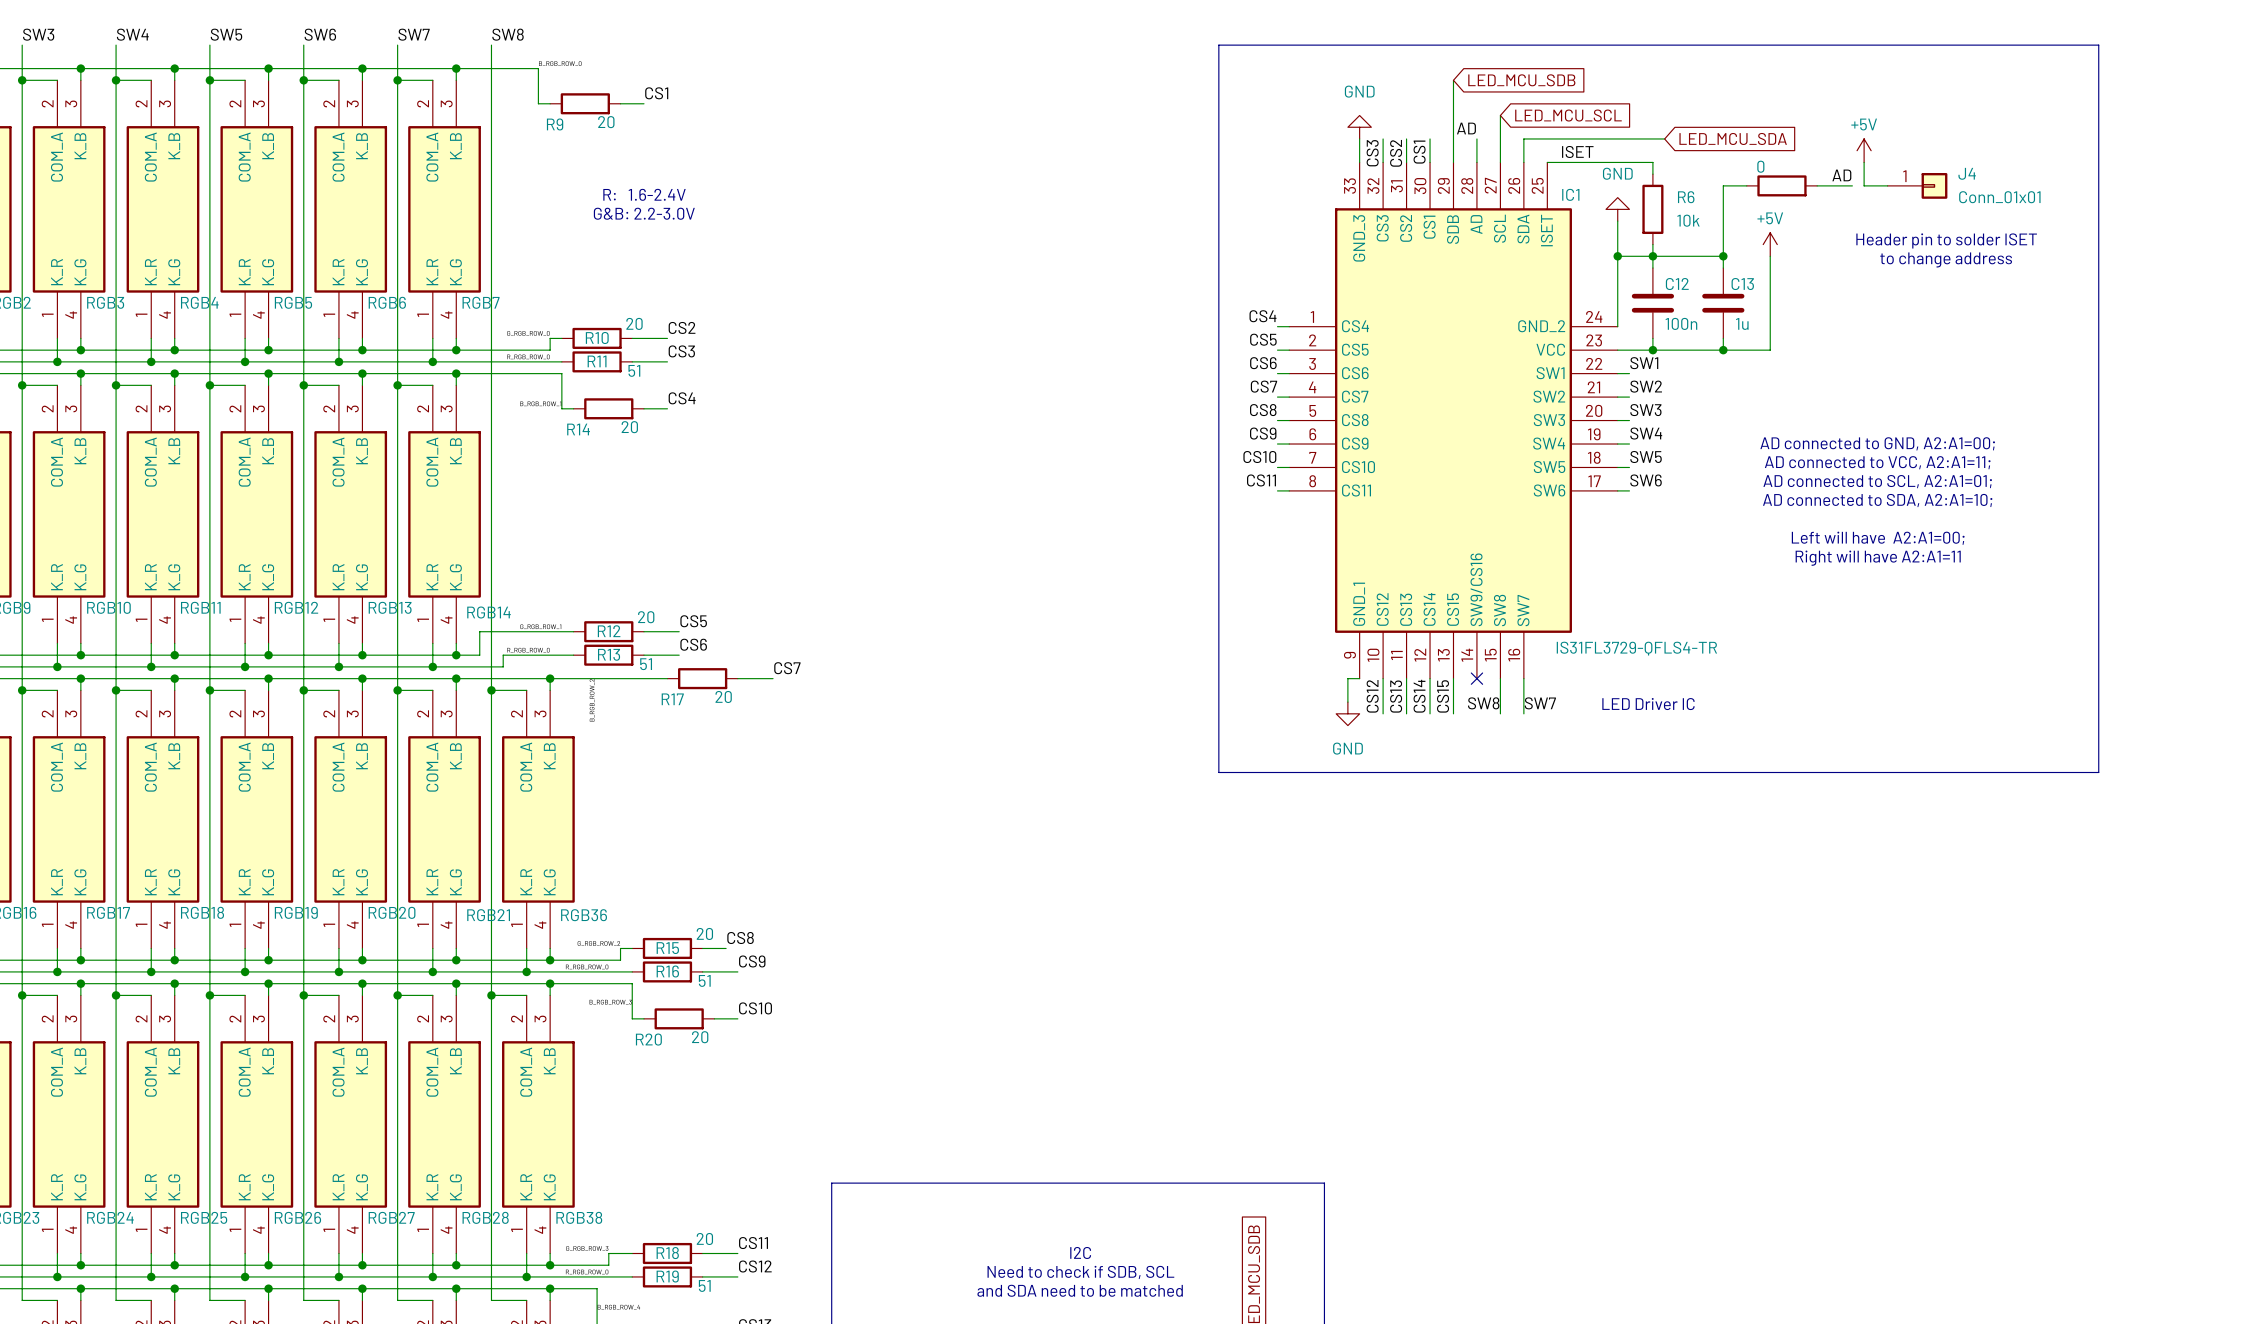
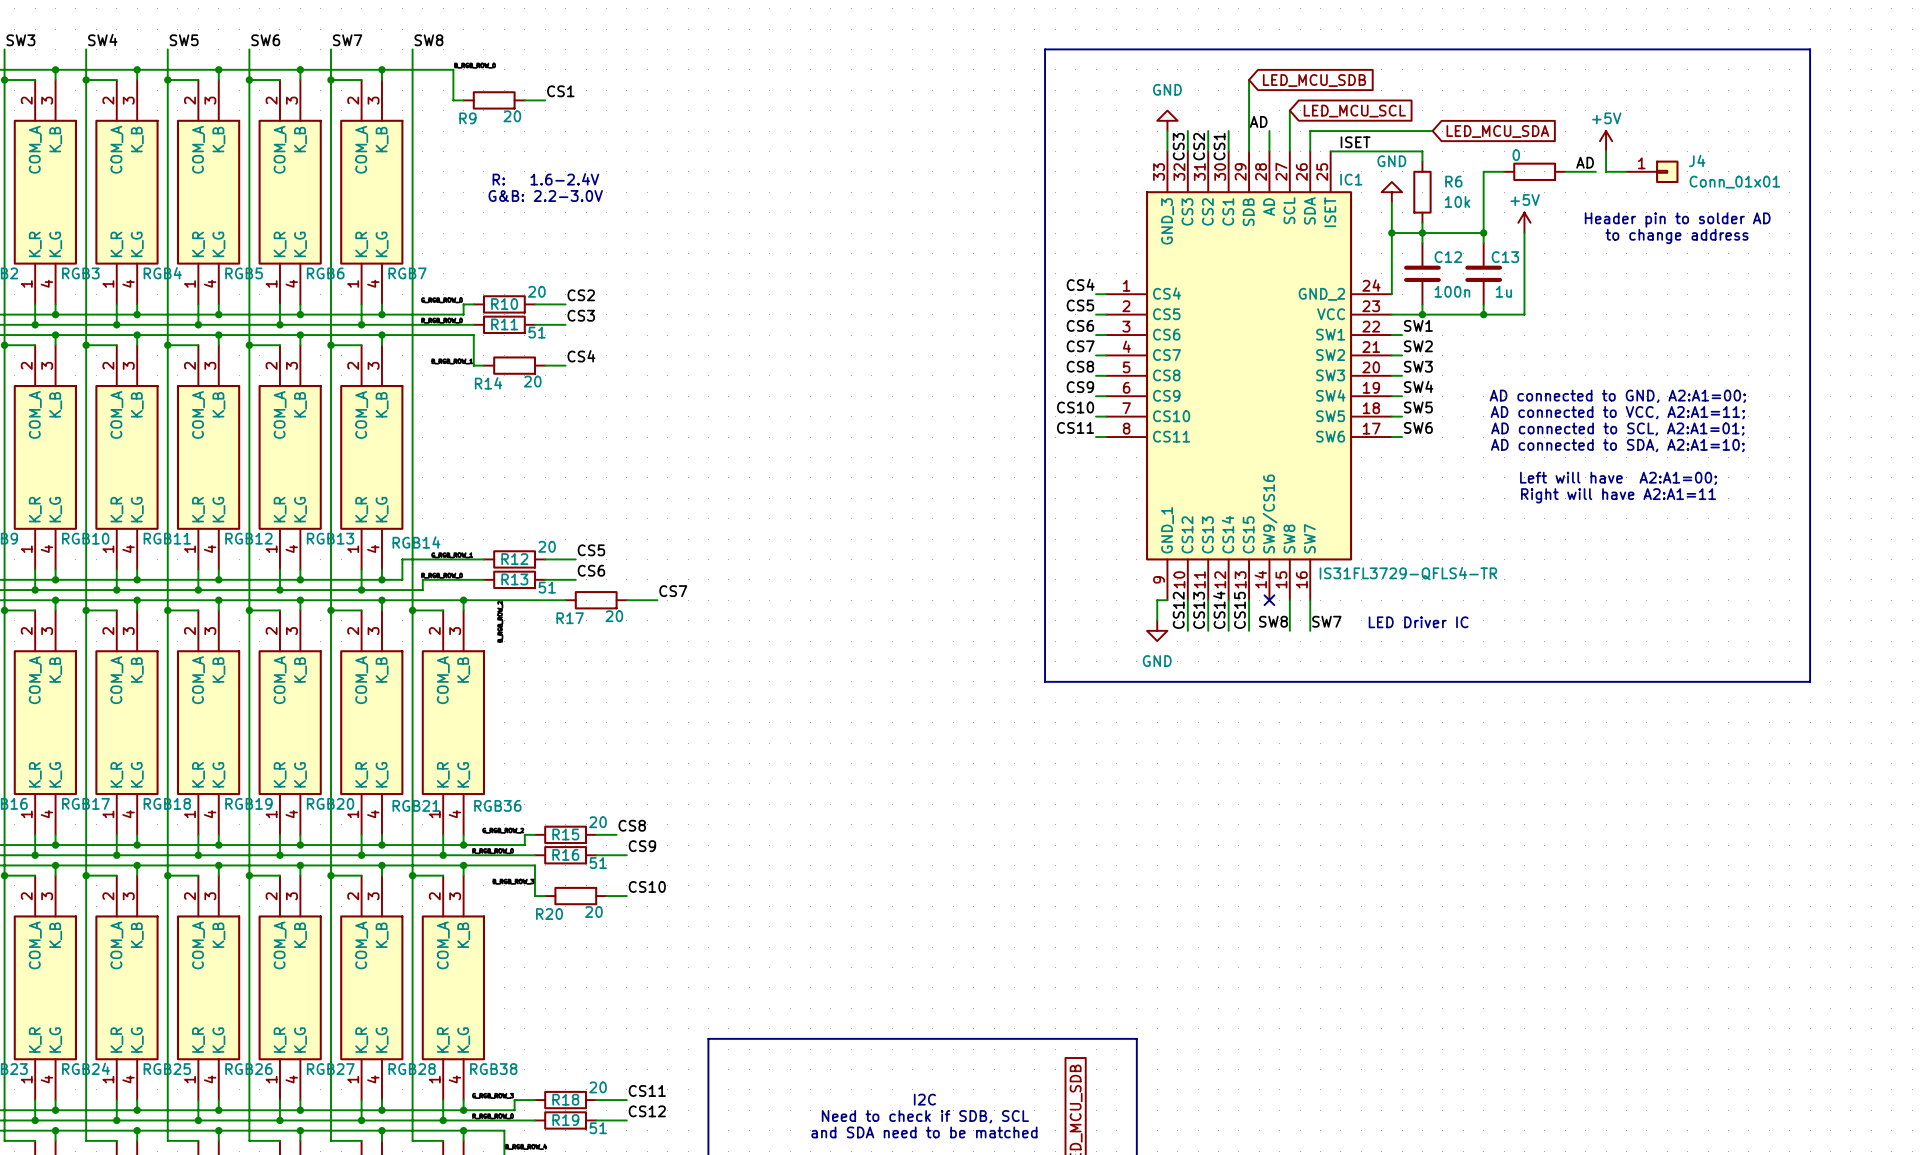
text: Header pin to solder ISET (1946, 240) -> Header pin to solder AD (1677, 220)

